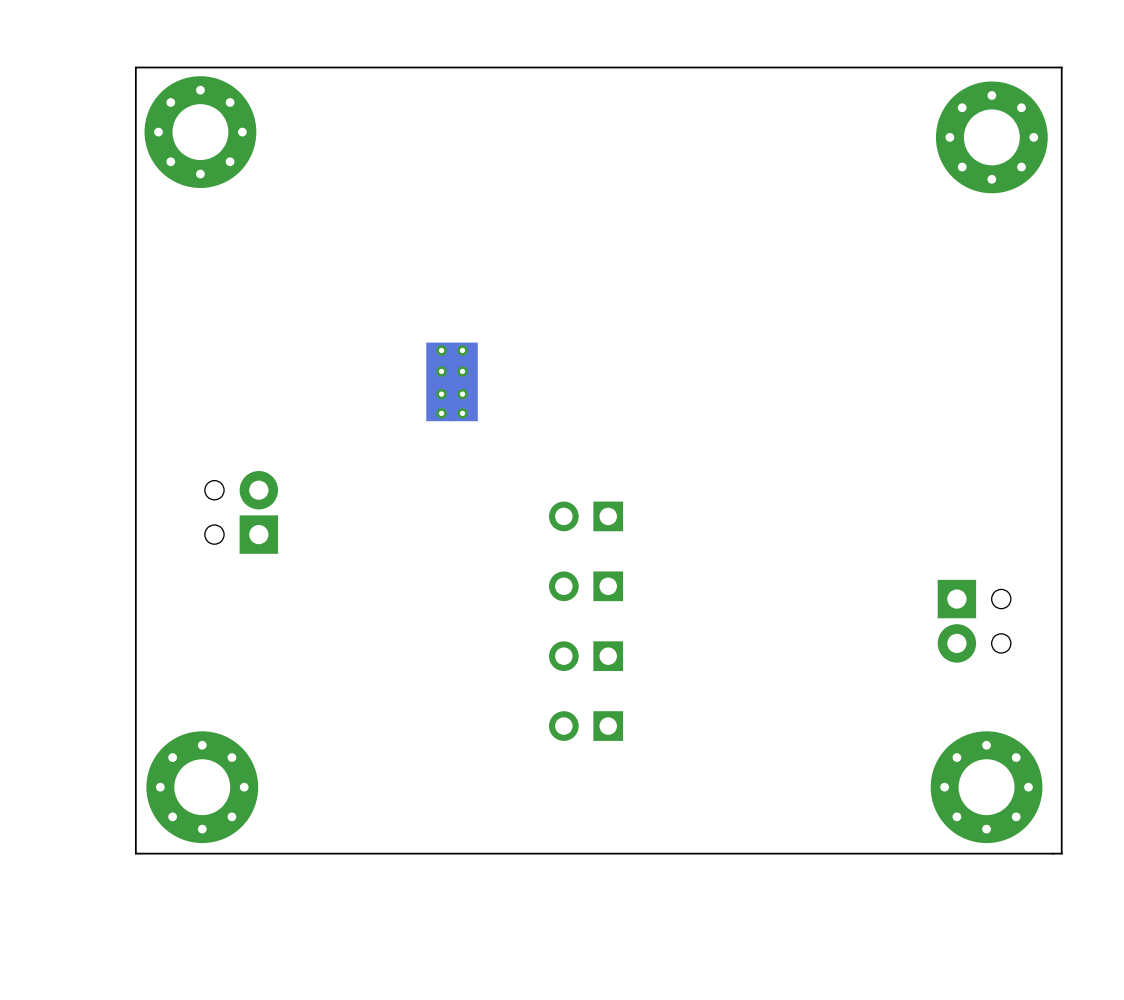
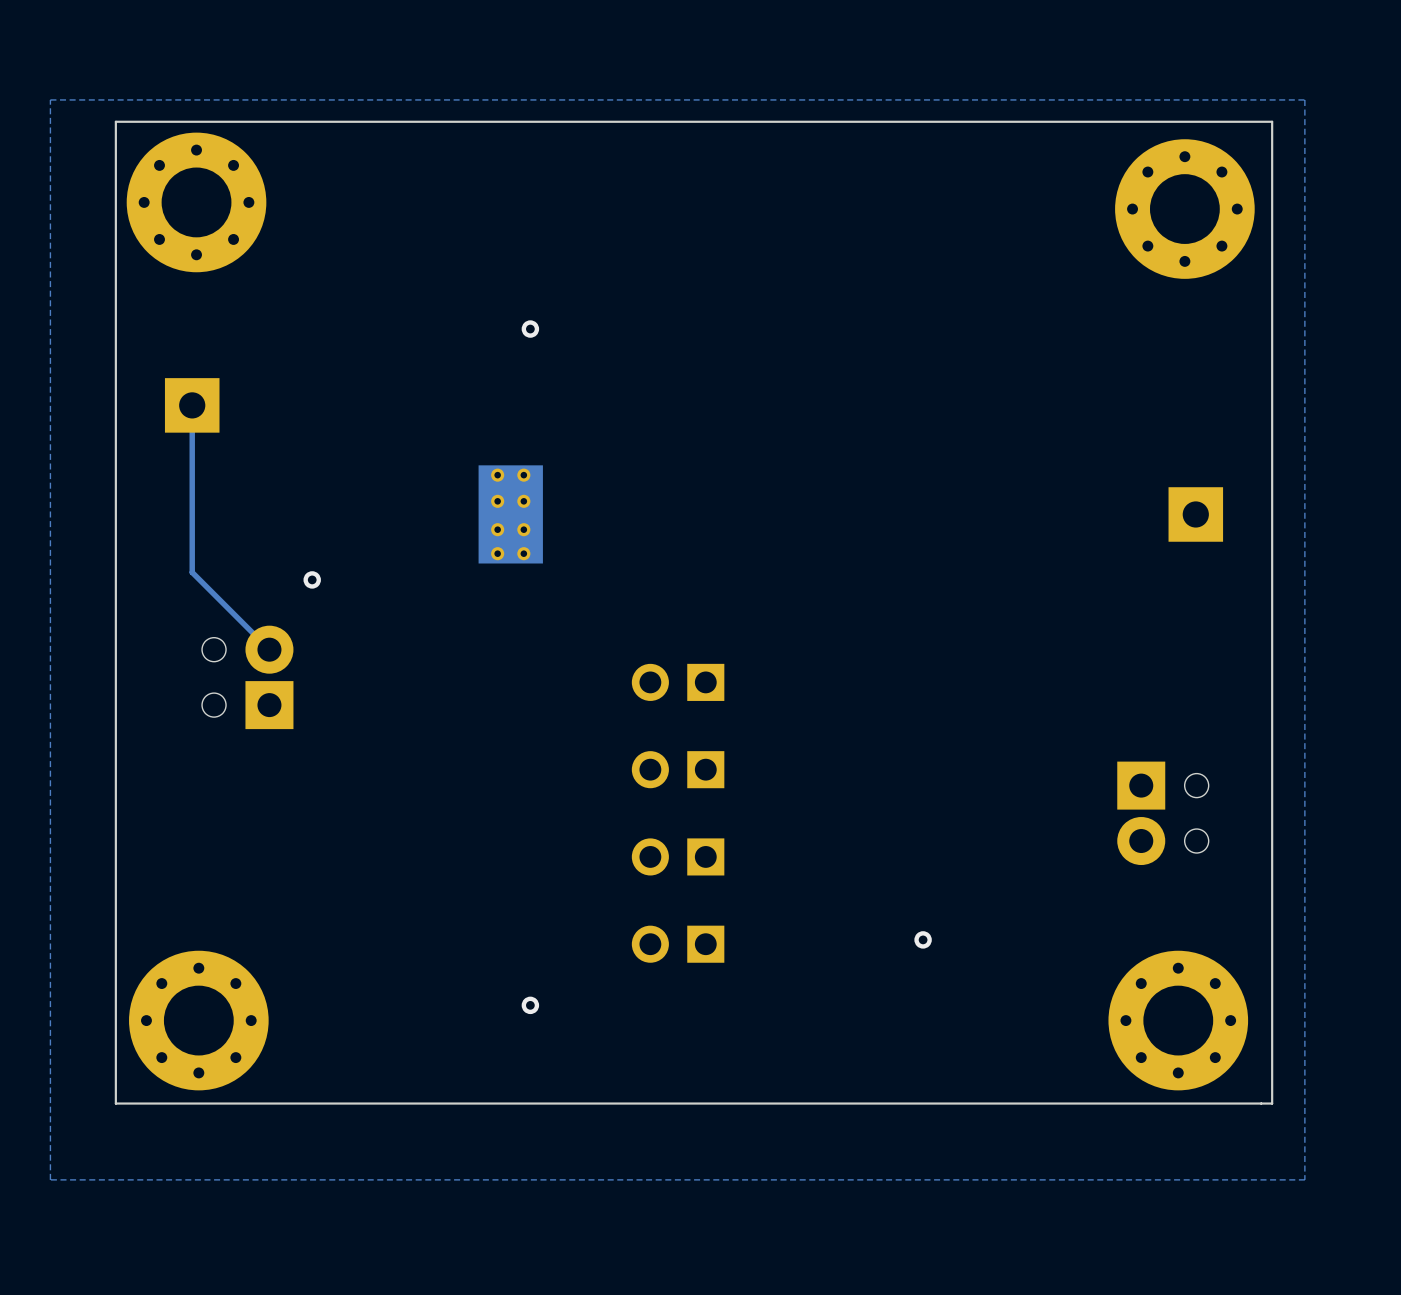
zone outline: none -> (1304, 99) (1304, 1179) (50, 1179) (50, 99) (1304, 99)
via: none -> (530, 329)
track: none -> (192, 405) (192, 572) (269, 649)
part: none -> (192, 405)
part: none -> (1195, 514)
via: none -> (312, 579)
via: none -> (923, 939)
via: none -> (530, 1005)

